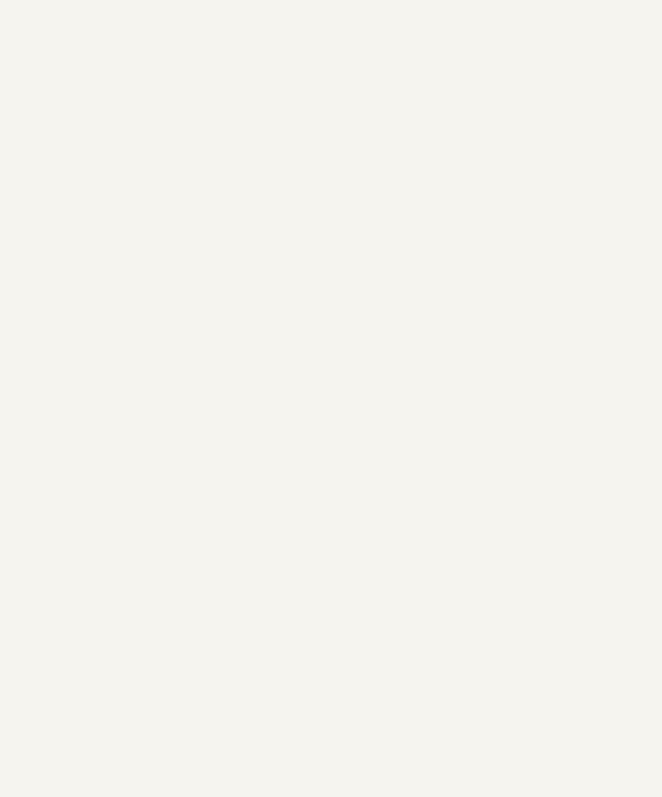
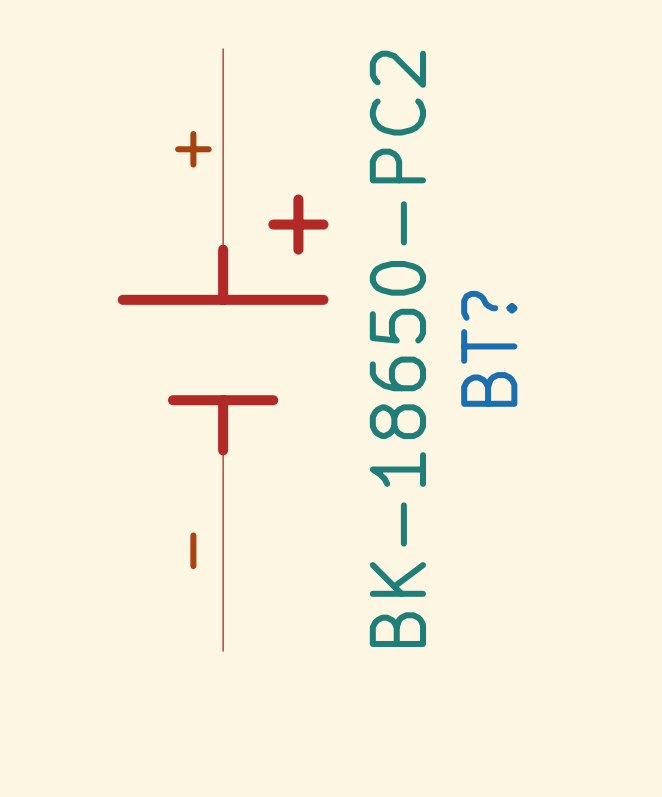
BT?: none -> BK-18650-PC2 (223, 350)

